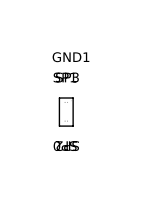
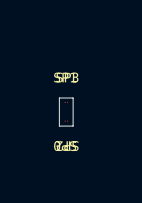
GND1: (71, 100) -> none

